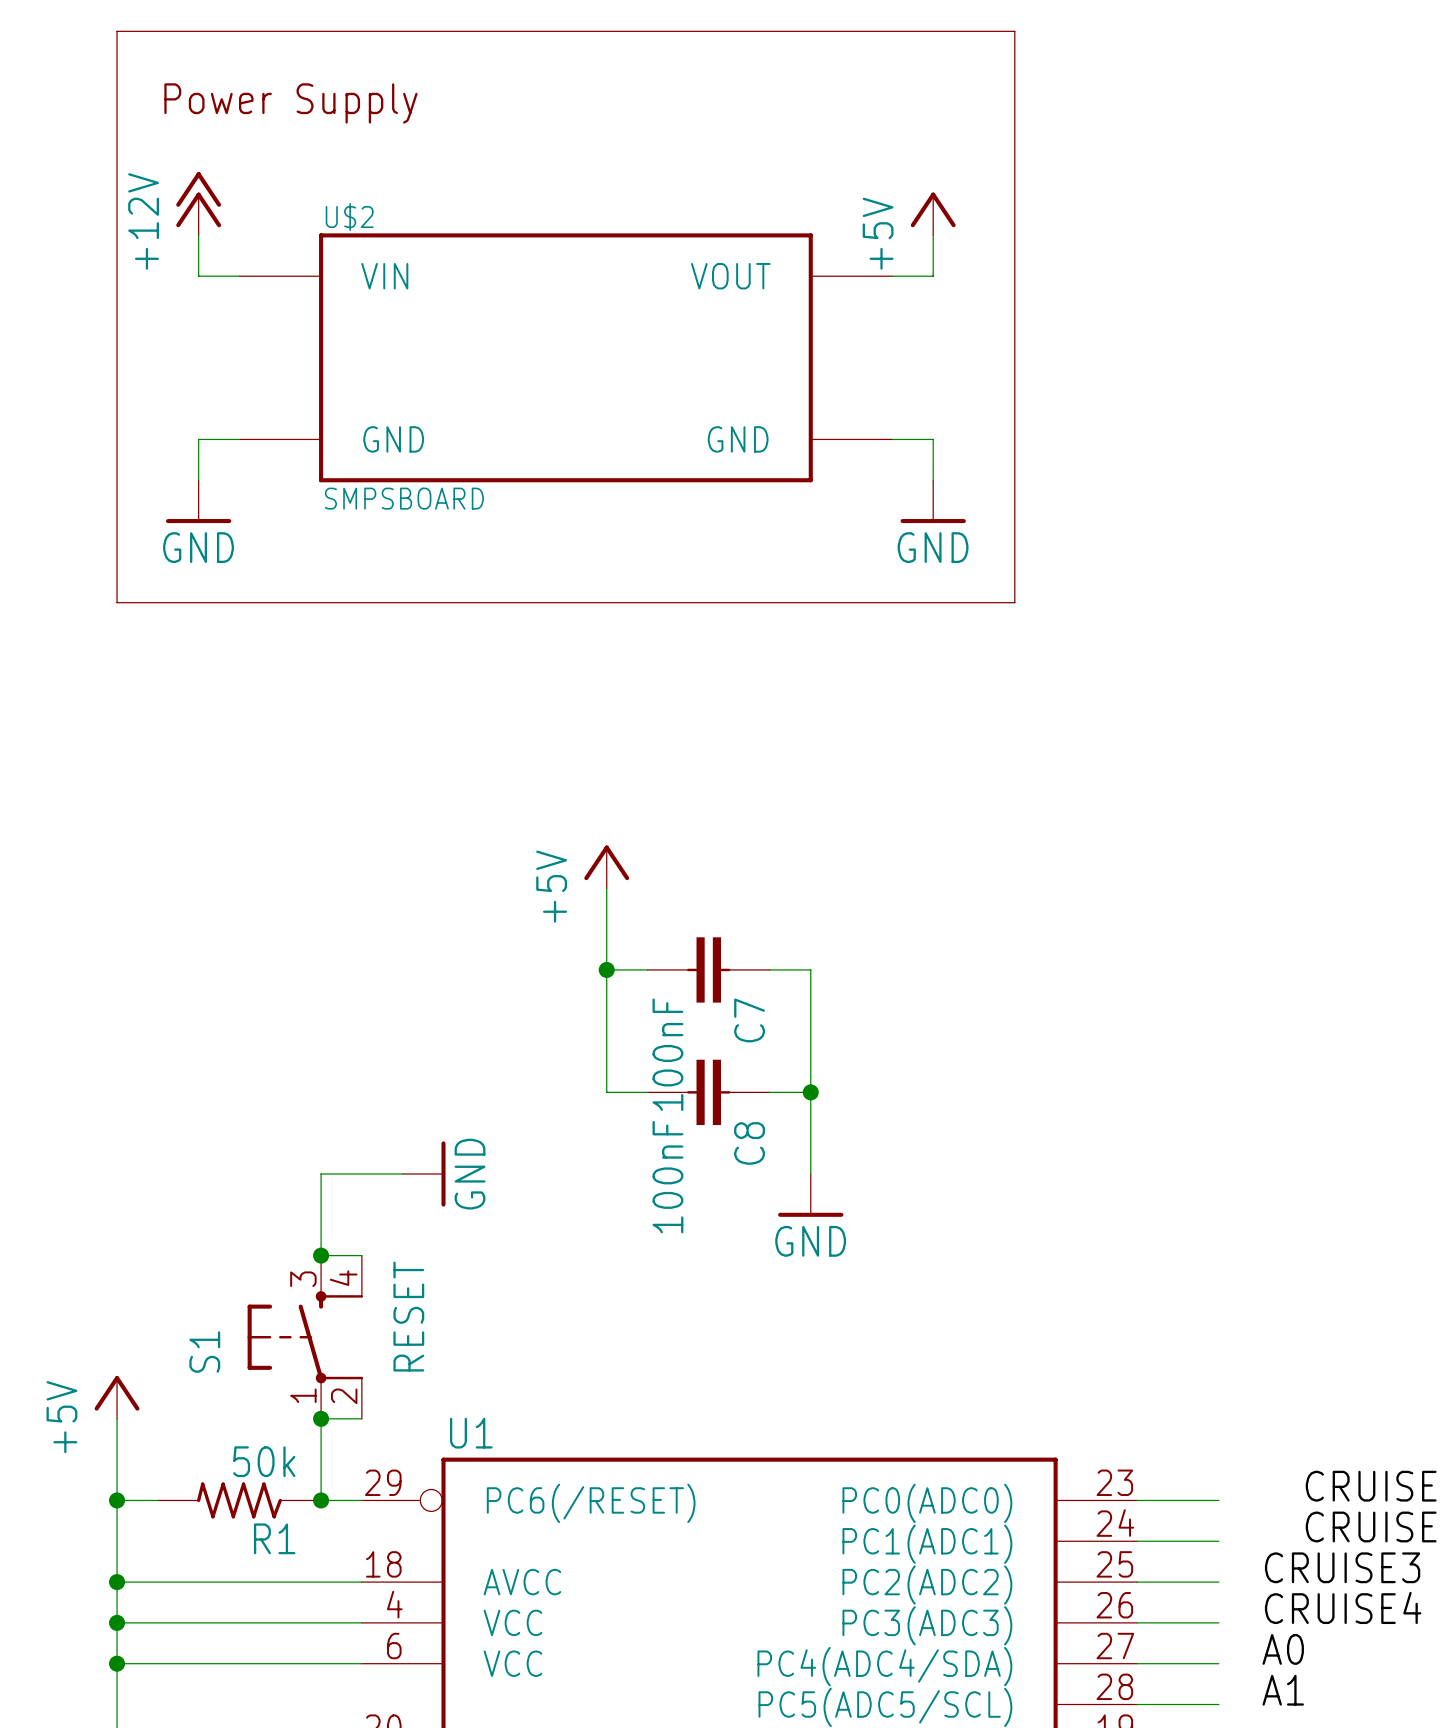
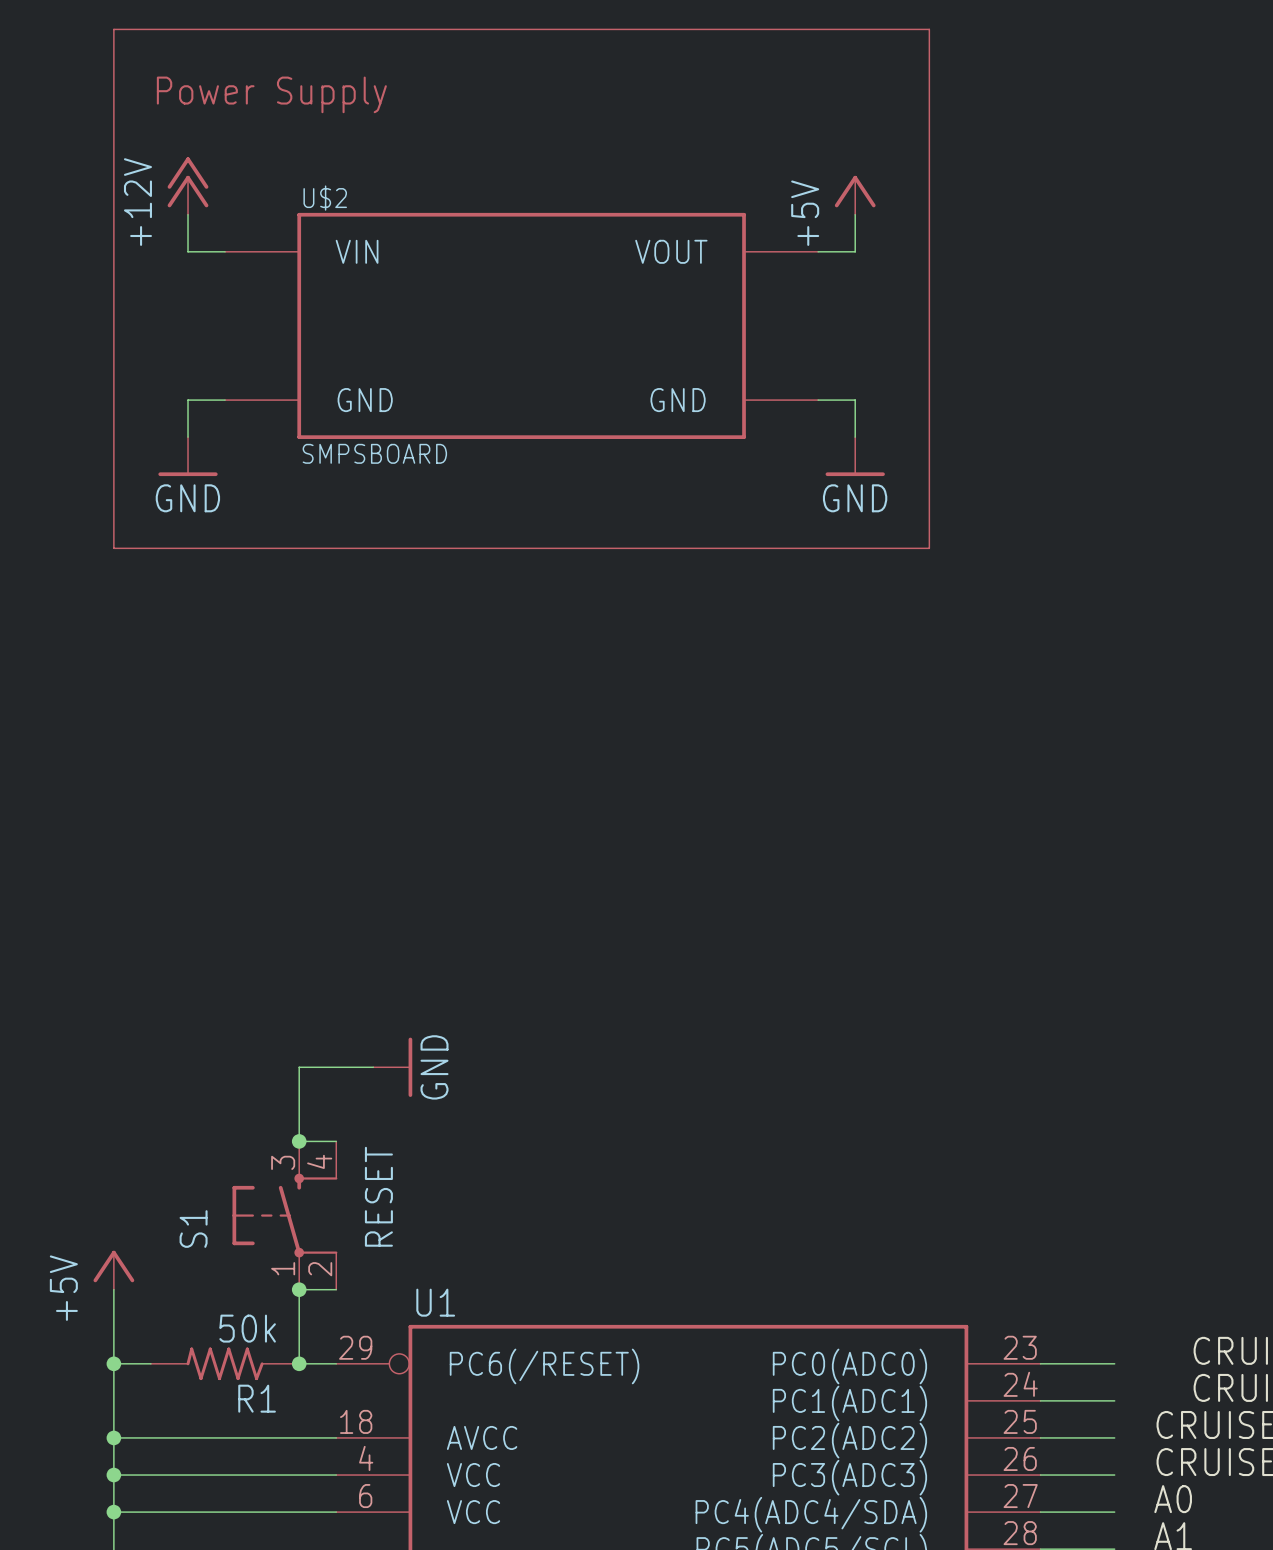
power symbol: +5V (606, 866) -> none
wire: (606, 888) (606, 1092) (647, 1092) -> none
wire: (606, 969) (647, 969) -> none
junction: (606, 969) -> none
C7: 100nF (708, 969) -> none
wire: (769, 969) (810, 969) (810, 1173) -> none
C8: 100nF (708, 1092) -> none
wire: (769, 1092) (810, 1092) -> none
junction: (810, 1092) -> none
power symbol: GND (810, 1195) -> none

